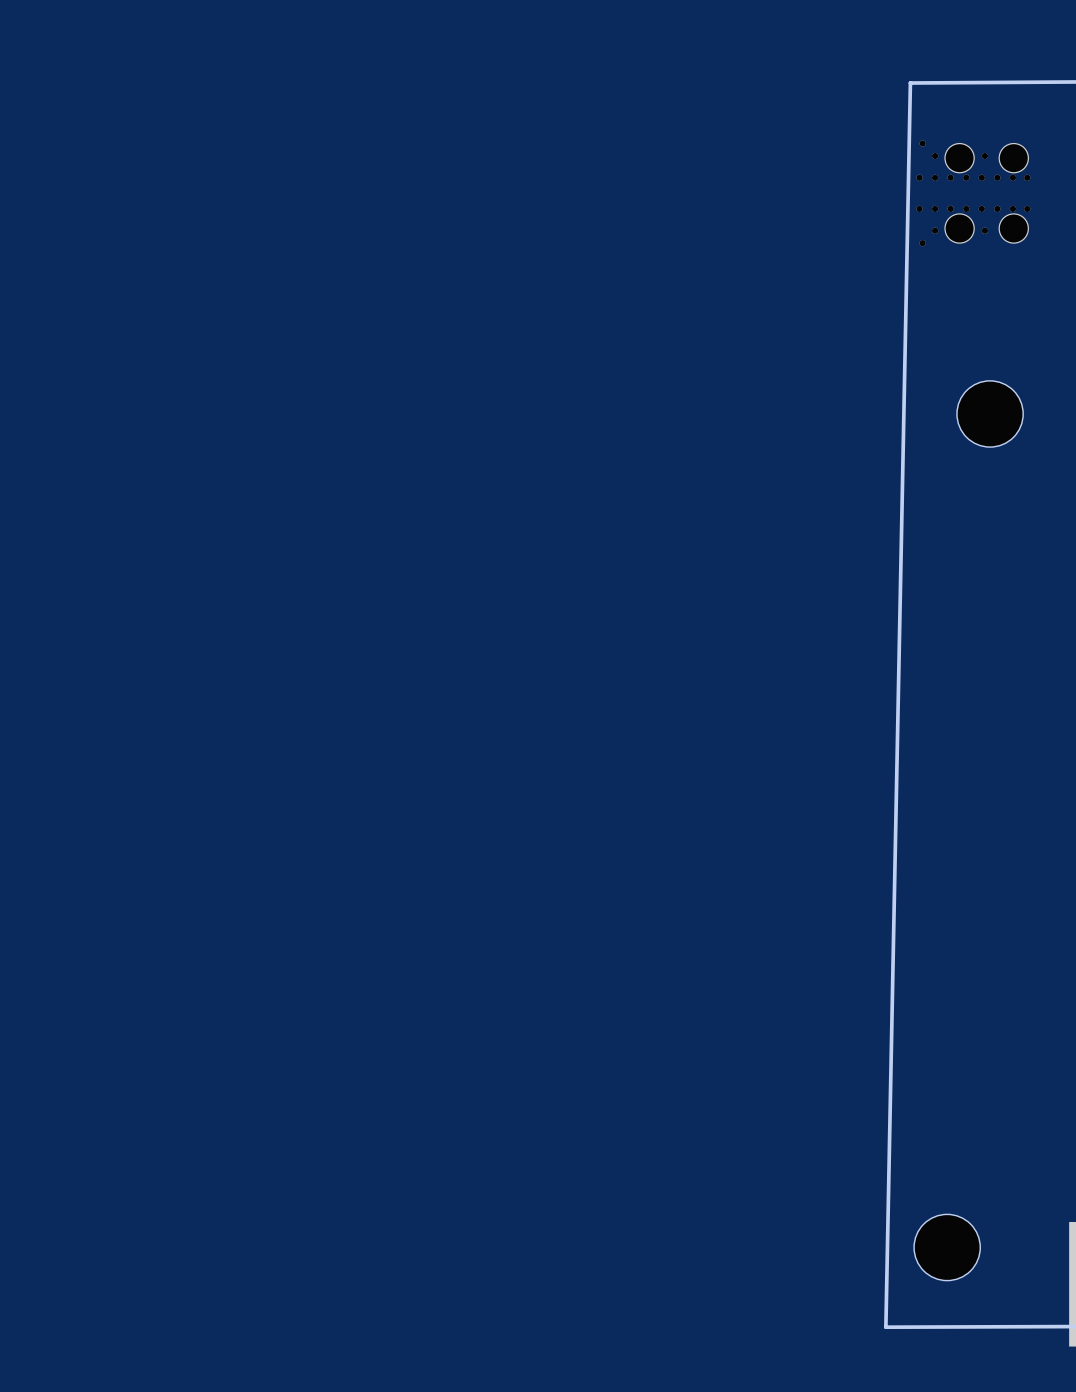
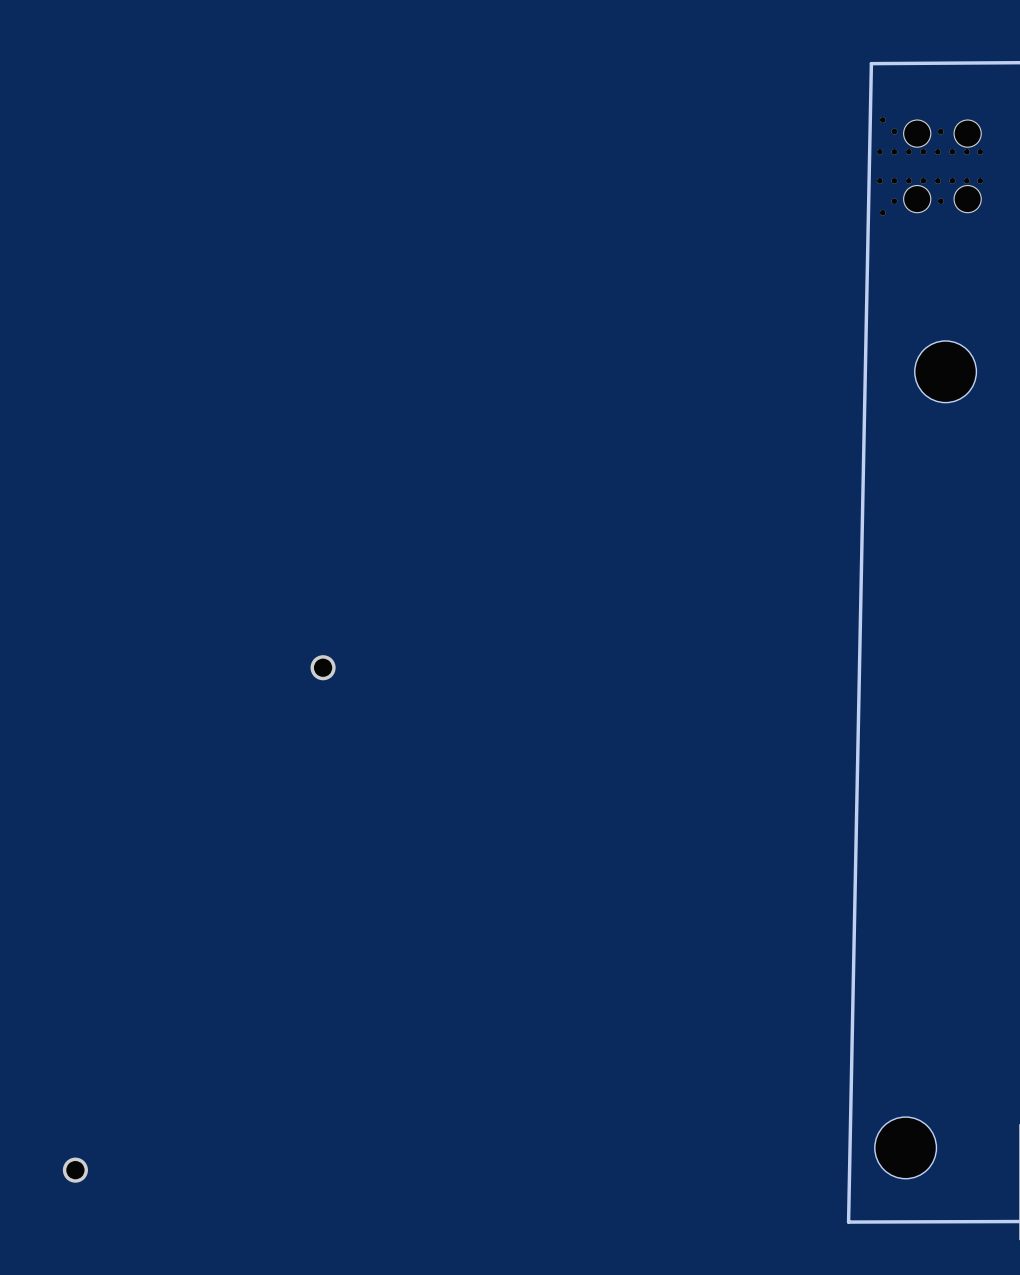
part: none -> (323, 667)
part: none -> (75, 1170)

